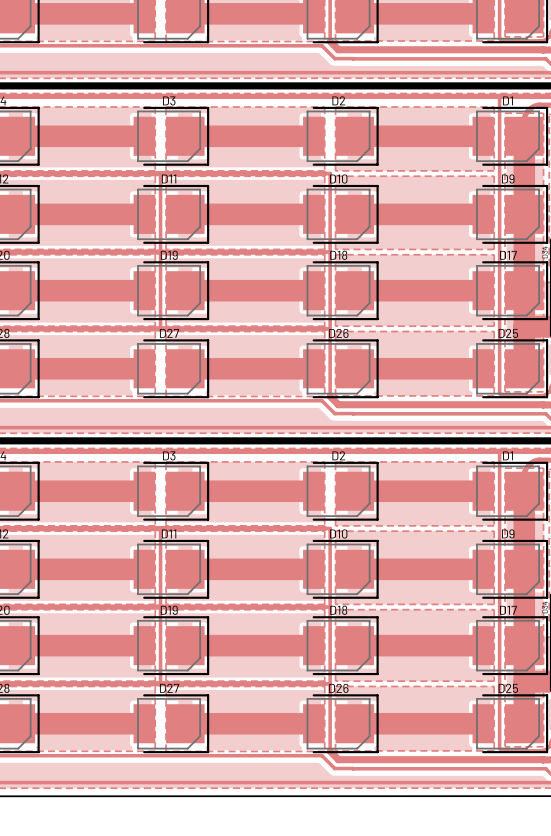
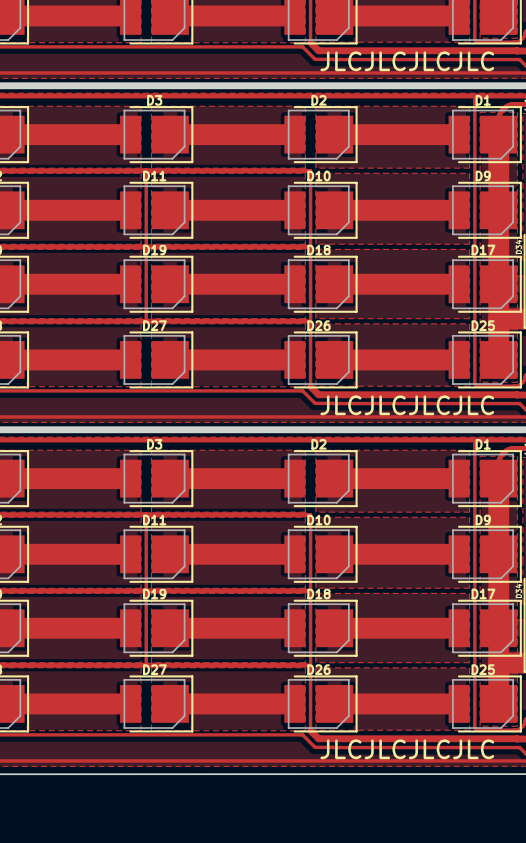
text: none -> JLCJLCJLCJLC (407, 61)
text: none -> JLCJLCJLCJLC (407, 405)
text: none -> JLCJLCJLCJLC (407, 749)

